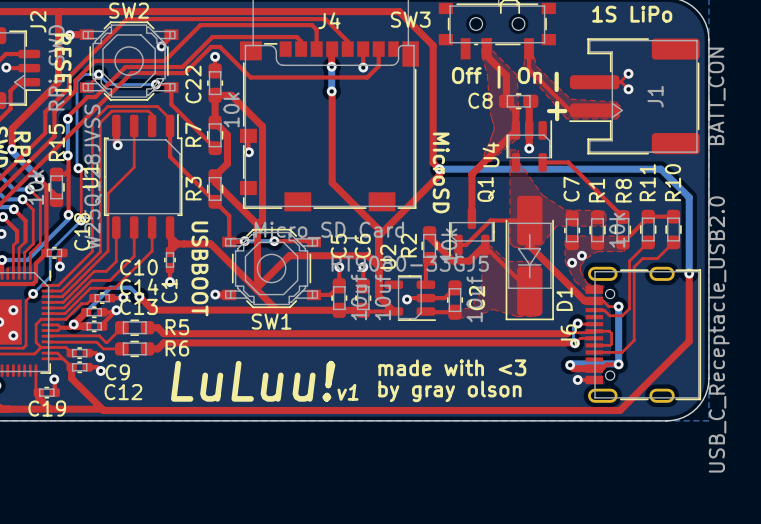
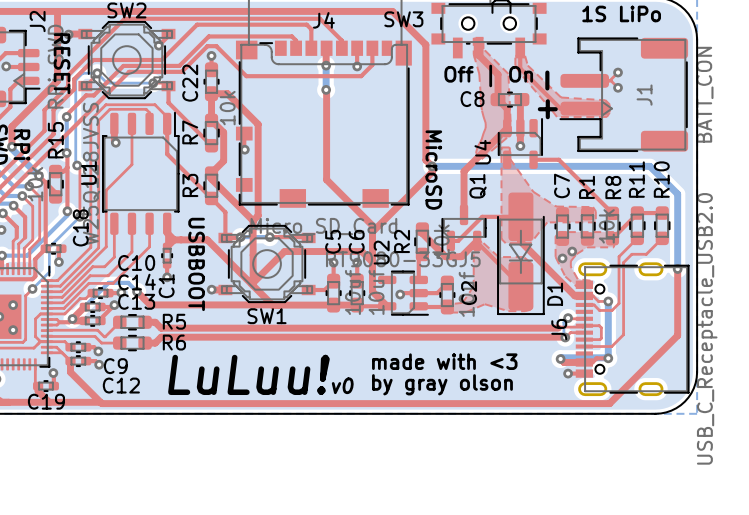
text: v1 (348, 392) -> v0 (342, 385)

